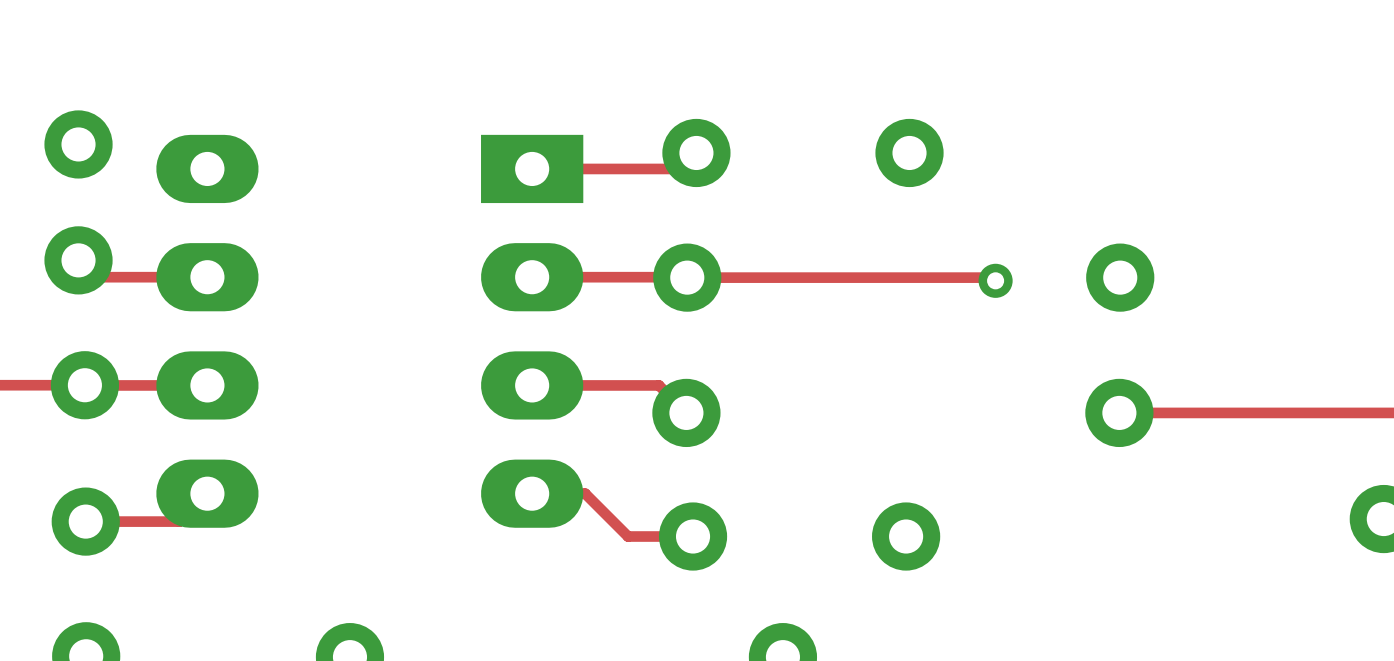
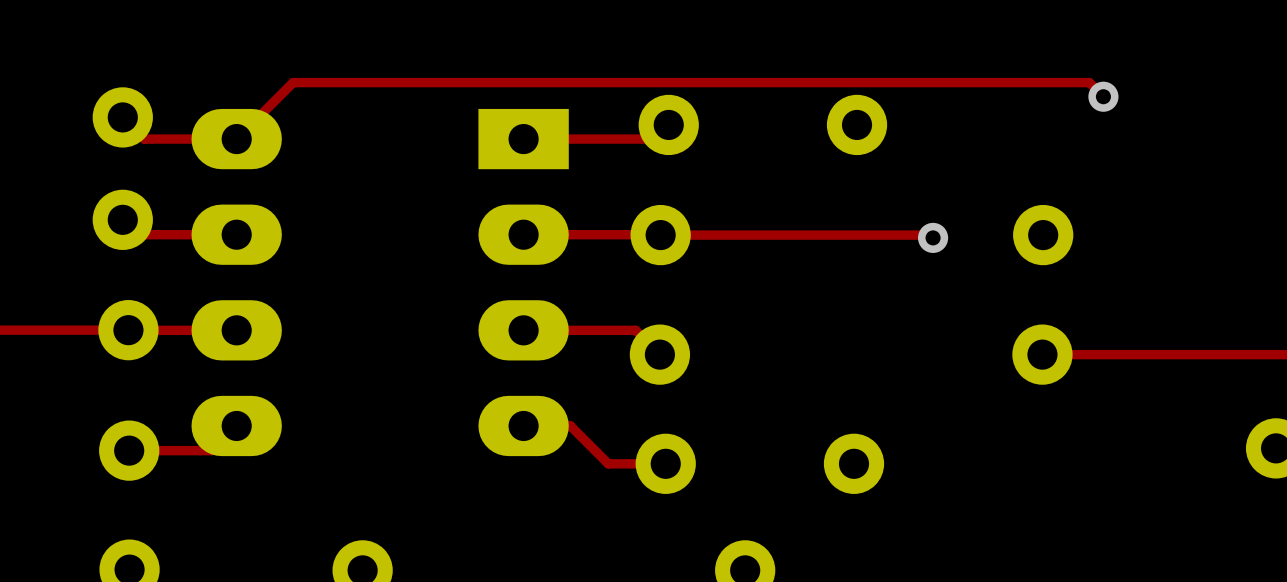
track: none -> (1103, 96) (1089, 82) (293, 82) (236, 139) (144, 139) (122, 117)
via: none -> (1103, 96)

